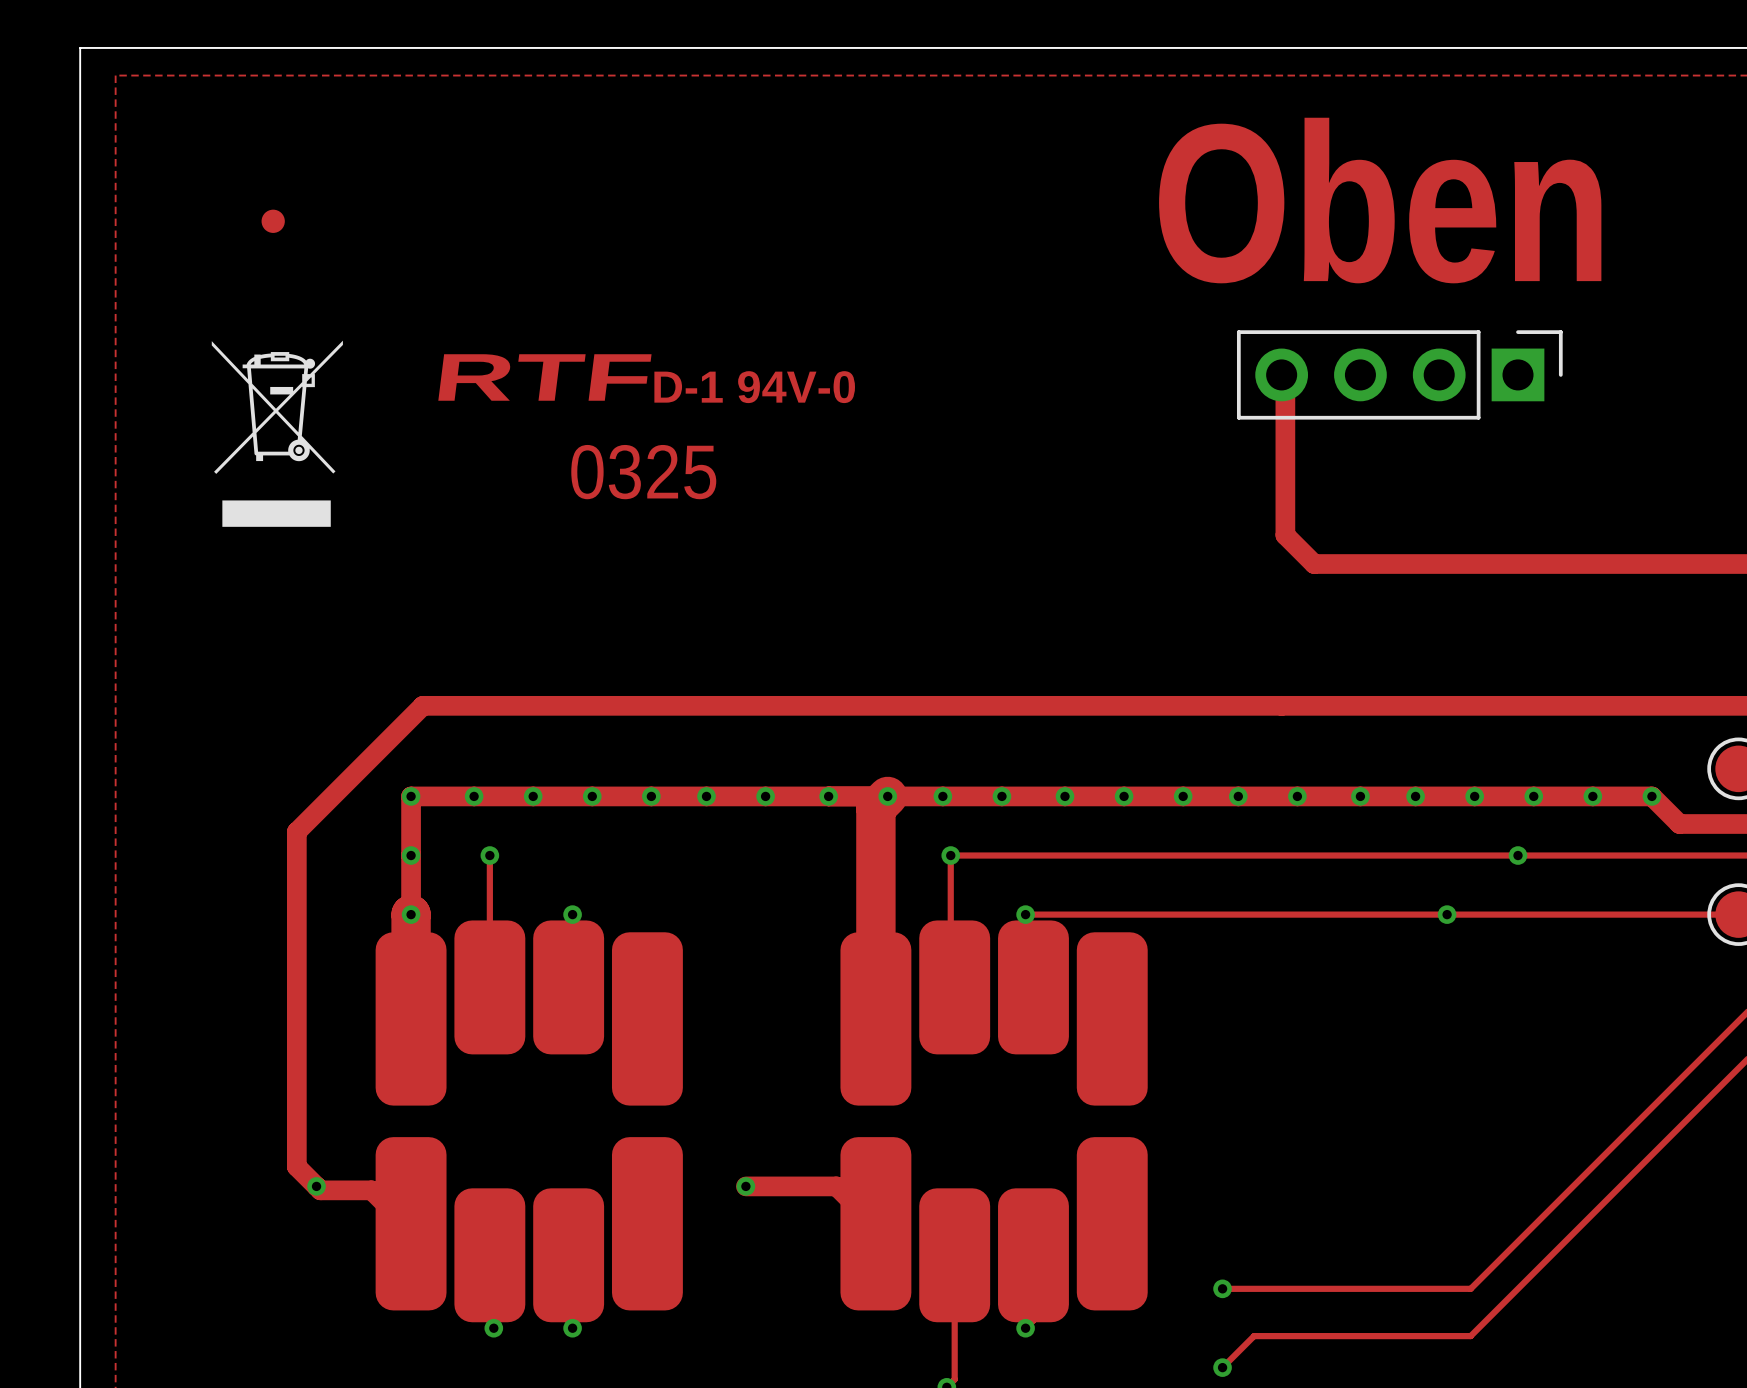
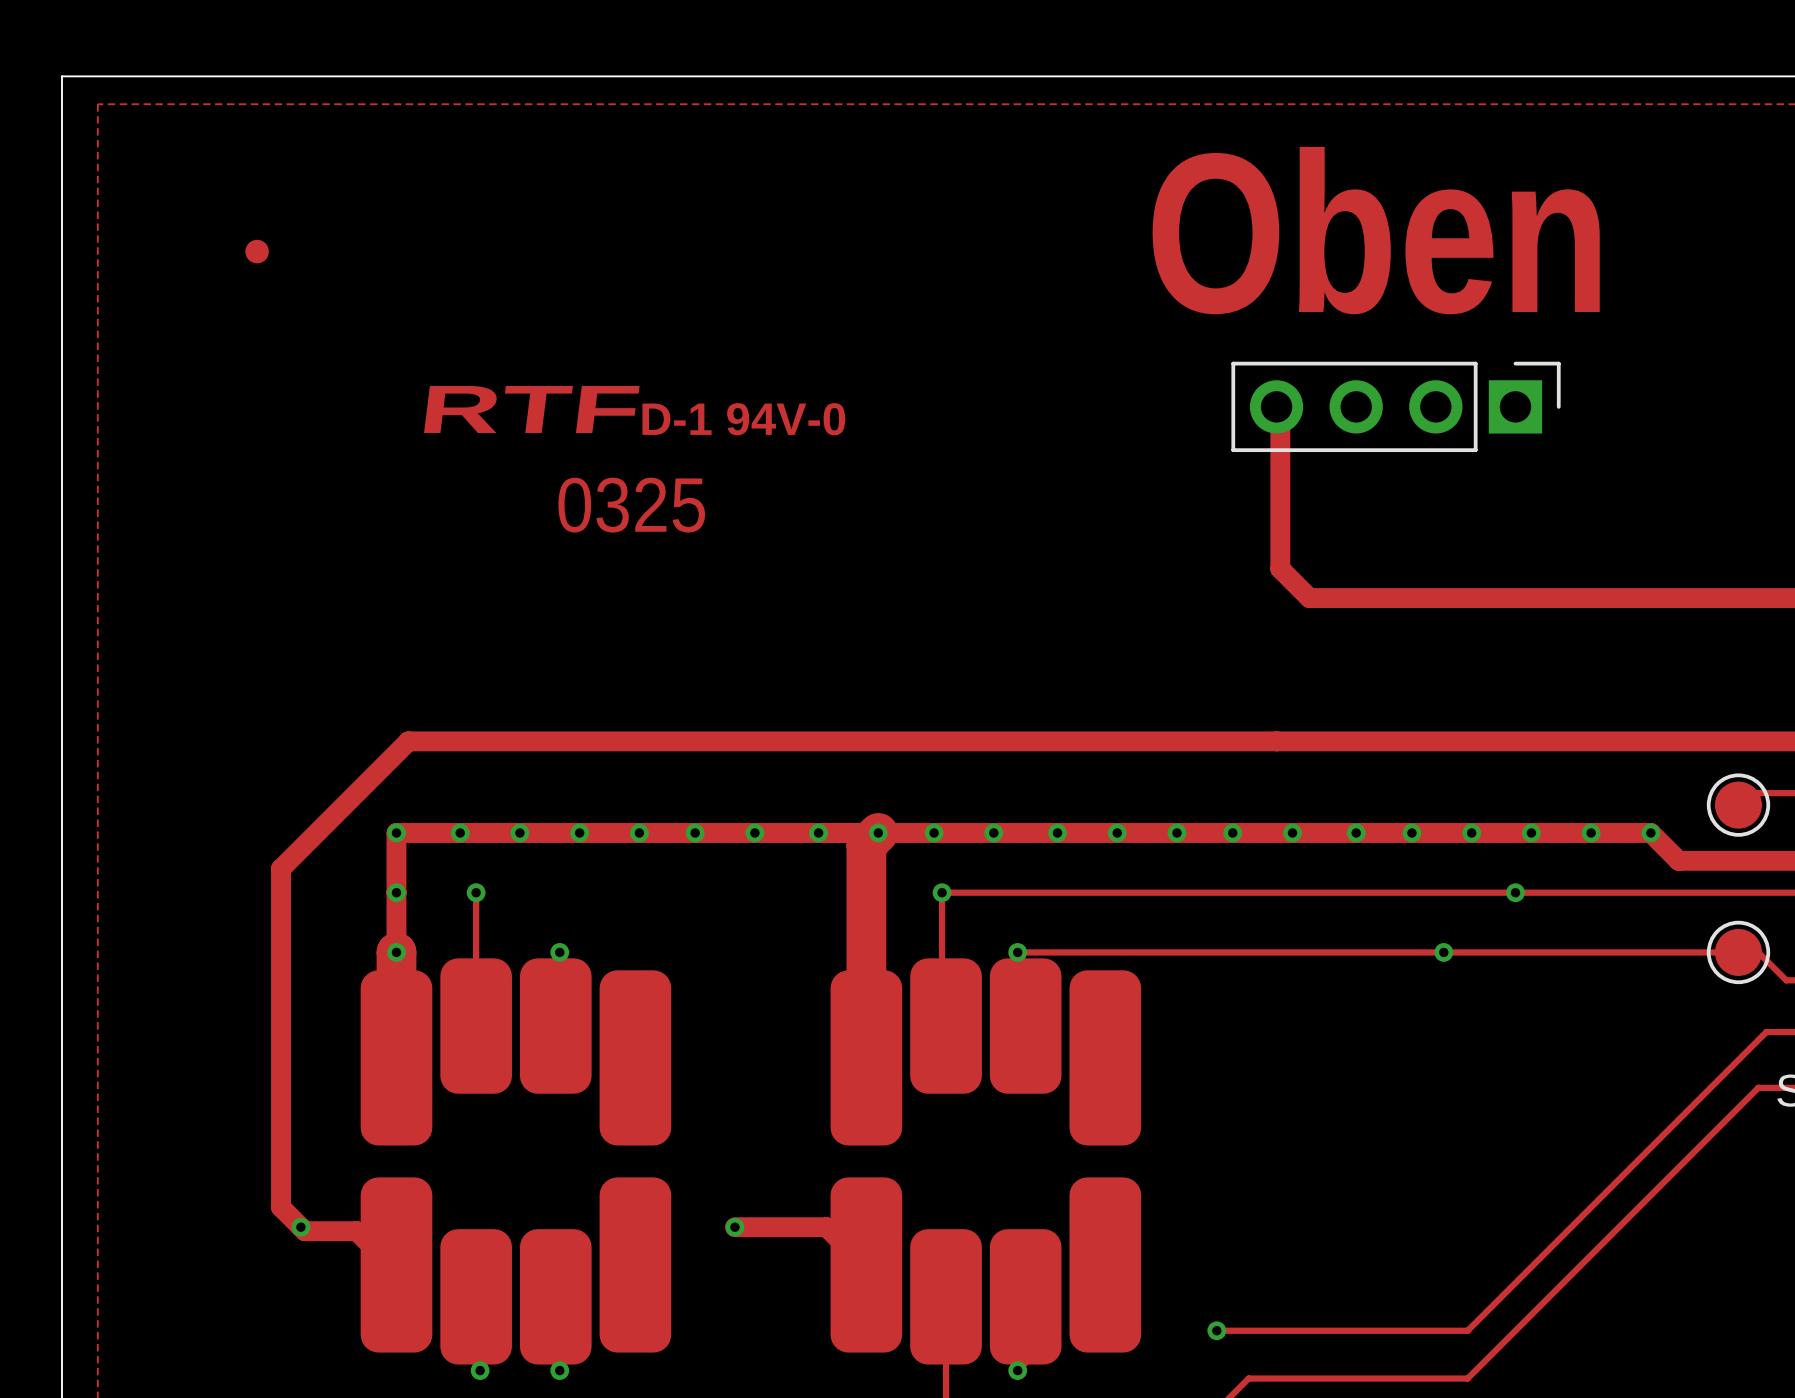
drawing: [211, 340, 343, 527] -> none

